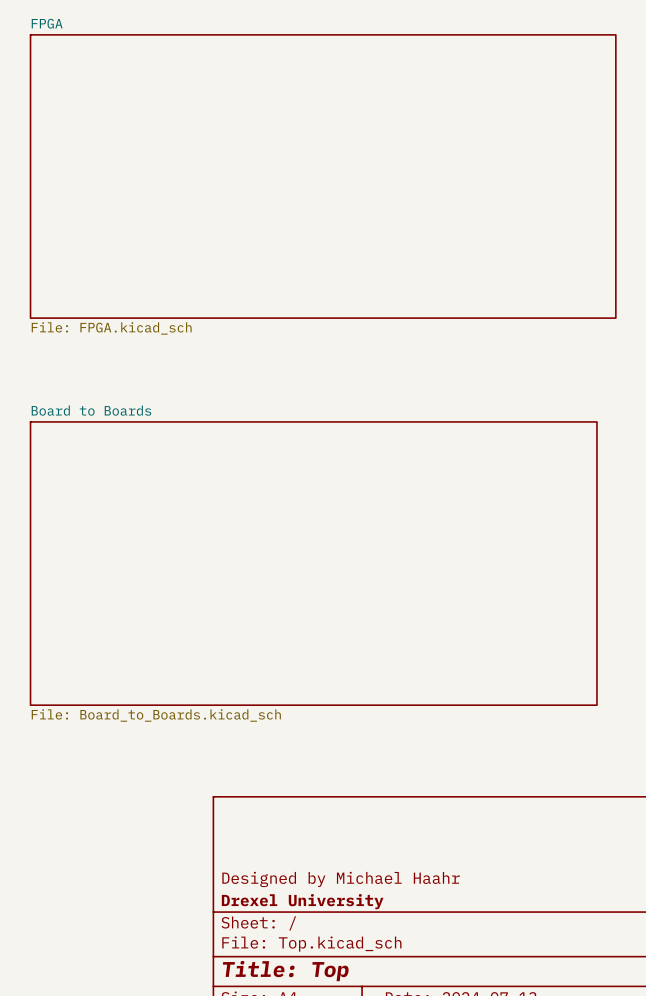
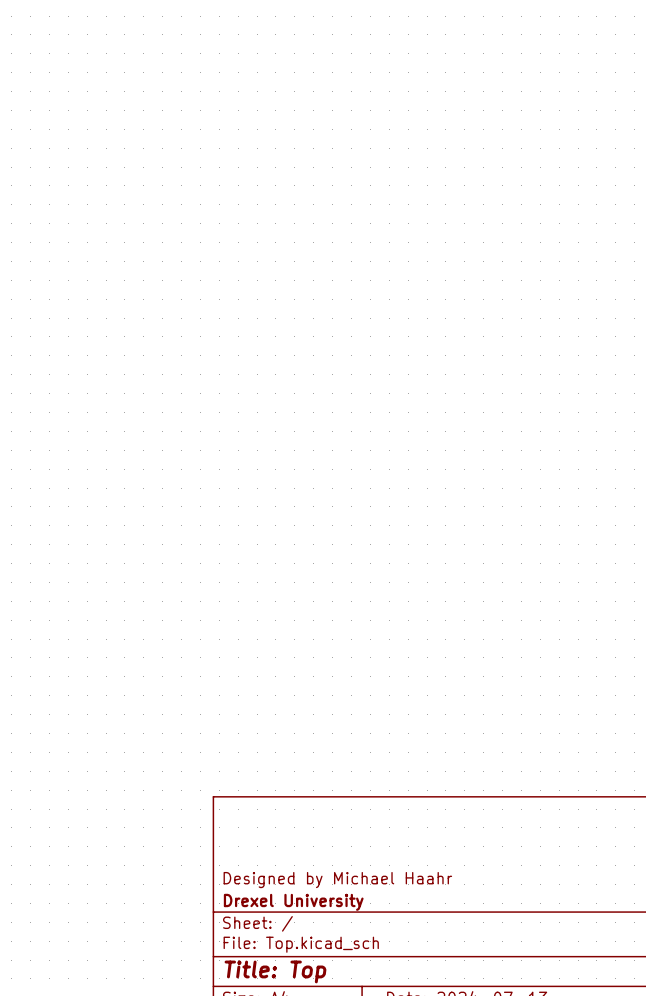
sheet FPGA: File: FPGA.kicad_sch (323, 176) -> none
sheet Board to Boards: File: Board_to_Boards.kicad_sch (313, 563) -> none

